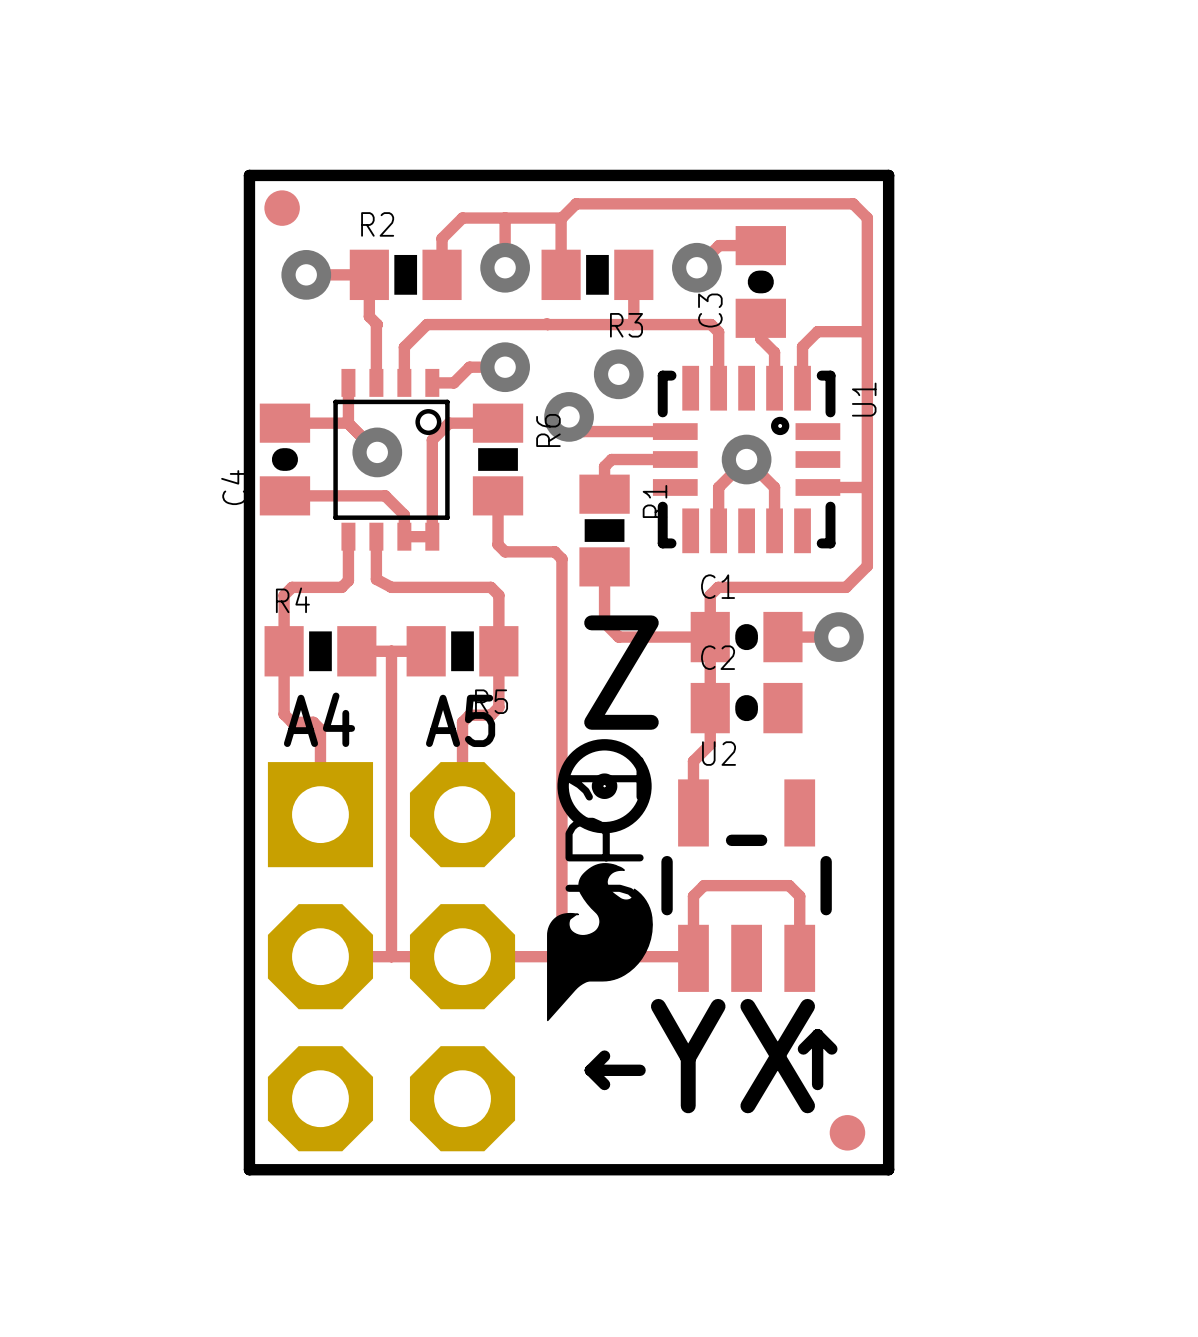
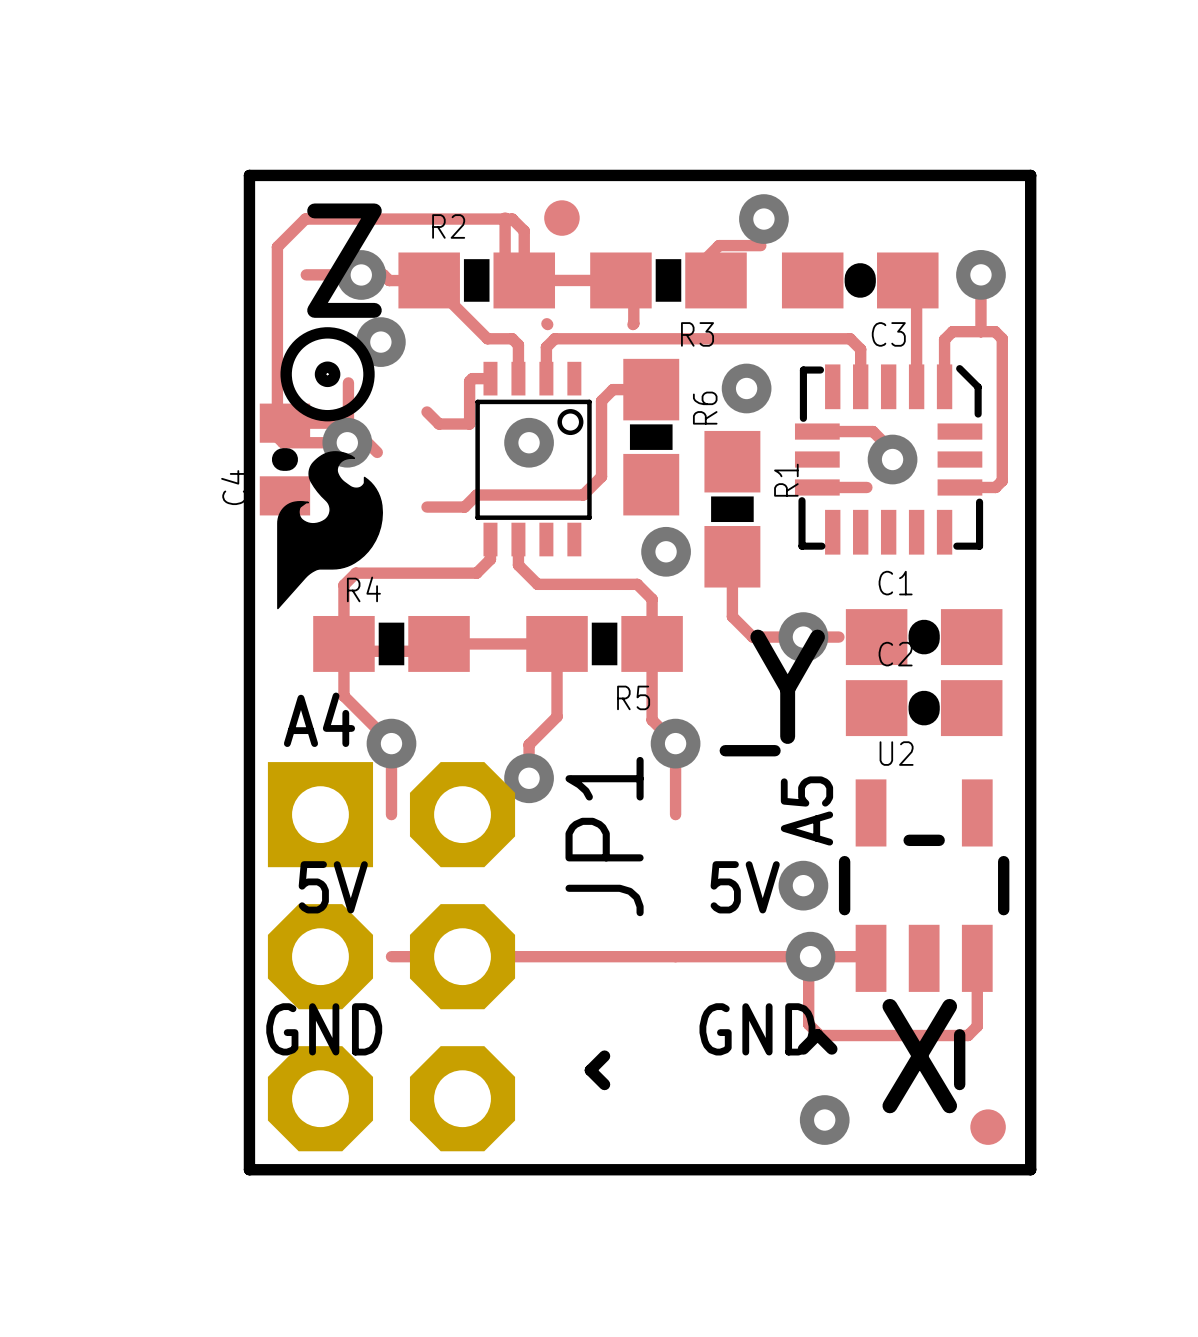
board edge: (888, 175) (888, 1169) -> (888, 175) (1030, 175) (1030, 1169) (888, 1169)
part position: (282, 208) -> (561, 218)
track: (561, 218) (462, 218) (442, 238) (442, 274) -> none
via: none -> (763, 219)
C3 footprint: [735, 226, 786, 338] -> [781, 252, 939, 309]
R2 footprint: [349, 249, 462, 301] -> [398, 252, 556, 309]
R3 footprint: [541, 249, 654, 301] -> [590, 252, 747, 309]
via: (505, 267) -> none
via: (696, 267) -> none
via: (306, 274) -> none
via: none -> (361, 274)
track: (369, 274) (369, 316) (377, 324) (376, 382) -> (369, 274) (383, 274) (389, 280) (429, 280) (487, 338) (512, 338) (518, 344) (518, 378)
track: (561, 274) (561, 218) (576, 203) (853, 203) (867, 218) (867, 566) (846, 587) (718, 587) (710, 595) (710, 744) (693, 761) (693, 812) -> none
track: none -> (980, 274) (980, 331)
via: none -> (980, 274)
track: none -> (620, 280) (524, 280) (524, 231) (512, 219) (305, 219) (277, 247) (277, 437) (283, 442) (347, 442)
track: none -> (907, 280) (916, 289) (916, 386)
track: (760, 318) (760, 338) (774, 352) (774, 388) -> none
track: (867, 331) (817, 331) (802, 346) (802, 388) -> none
via: none -> (380, 342)
track: (505, 367) (469, 367) (453, 382) (432, 382) -> none
via: (505, 367) -> none
via: (618, 374) -> none
track: none -> (490, 378) (472, 378) (469, 381) (469, 424) (439, 424) (427, 411)
track: none -> (546, 378) (546, 347) (554, 338) (850, 338) (860, 349) (860, 386)
track: (404, 382) (404, 347) (427, 324) (711, 324) (718, 332) (718, 388) -> none
track: none -> (944, 386) (944, 339) (952, 331) (995, 331) (1002, 338) (1002, 480) (995, 487) (959, 487)
via: none -> (746, 388)
track: none -> (651, 389) (612, 389) (601, 401) (601, 476) (583, 495) (476, 495) (464, 507) (427, 507)
R6 footprint: [472, 403, 524, 516] -> [623, 358, 680, 516]
track: (569, 416) (583, 431) (675, 431) -> none
via position: (569, 416) -> (529, 442)
track: (498, 423) (449, 423) (432, 440) (432, 536) (404, 536) (404, 514) (385, 495) (284, 495) -> none
track: none -> (817, 431) (872, 431) (892, 451) (892, 459)
via position: (377, 452) -> (347, 442)
part: (391, 459) -> none
part: none -> (533, 459)
track: (675, 459) (611, 459) (604, 466) (604, 494) -> none
U1: (746, 459) -> none
via: (746, 459) -> none
part: none -> (889, 459)
via: none -> (892, 459)
R1 footprint: [579, 474, 630, 587] -> [704, 430, 761, 588]
track: (498, 495) (498, 544) (505, 551) (554, 551) (561, 558) (561, 956) -> none
track: (718, 530) (718, 487) (746, 459) (774, 487) (774, 530) -> none
track: (348, 536) (348, 580) -> (490, 539) (490, 559) (476, 573) (355, 573) (348, 580)
track: (376, 536) (376, 579) (391, 587) (490, 587) (498, 595) (498, 707) (490, 715) (469, 715) (462, 722) (462, 814) -> none
track: none -> (518, 539) (518, 565) (537, 584) (637, 584) (652, 599) (652, 720) (675, 743) (675, 814)
via: none -> (666, 551)
track: none -> (732, 556) (732, 616) (752, 637) (782, 637)
track: (604, 566) (604, 622) (618, 637) (710, 637) -> none
track: (343, 585) (341, 587) (292, 587) (284, 595) (284, 714) (292, 722) (313, 722) (320, 729) (320, 814) -> none
C1 footprint: [690, 611, 803, 663] -> [845, 609, 1003, 666]
R4 footprint: [264, 626, 377, 677] -> [313, 615, 470, 672]
R5 footprint: [406, 626, 519, 677] -> [526, 615, 683, 672]
via position: (838, 637) -> (803, 637)
track: none -> (439, 643) (557, 643) (557, 716) (529, 744) (529, 778)
track: (391, 651) (391, 743) -> (343, 585) (343, 696) (391, 743)
text position: Z (621, 672) -> Z (344, 260)
C2 footprint: [690, 682, 803, 734] -> [845, 680, 1003, 737]
text rotation: 0° (460, 720) -> 90° counterclockwise (806, 810)
text position: A5 (460, 720) -> A5 (806, 810)
via: none -> (391, 743)
via: none -> (675, 743)
via: none -> (529, 778)
drawing position: (604, 786) -> (327, 374)
drawing position: (604, 786) -> (327, 374)
track: (391, 814) (391, 956) (320, 956) -> none
U2 position: (746, 885) -> (924, 885)
via: none -> (803, 885)
text: none -> 5V (333, 887)
text: none -> 5V (745, 887)
drawing position: (599, 942) -> (330, 530)
track: (691, 956) (693, 958) (693, 896) (703, 885) (789, 885) (799, 896) (799, 958) -> (691, 956) (869, 956) (871, 958)
track: none -> (810, 956) (808, 958) (808, 1024) (819, 1035) (968, 1035) (977, 1026) (977, 958)
via: none -> (810, 956)
text: none -> GND (324, 1029)
text: none -> GND (757, 1029)
line: (817, 1034) (817, 1084) -> (959, 1034) (959, 1084)
text position: Y (688, 1056) -> Y (787, 686)
text position: X (777, 1056) -> X (919, 1056)
line: (590, 1070) (640, 1070) -> (725, 750) (775, 750)
via: none -> (824, 1120)
part position: (847, 1132) -> (988, 1127)

